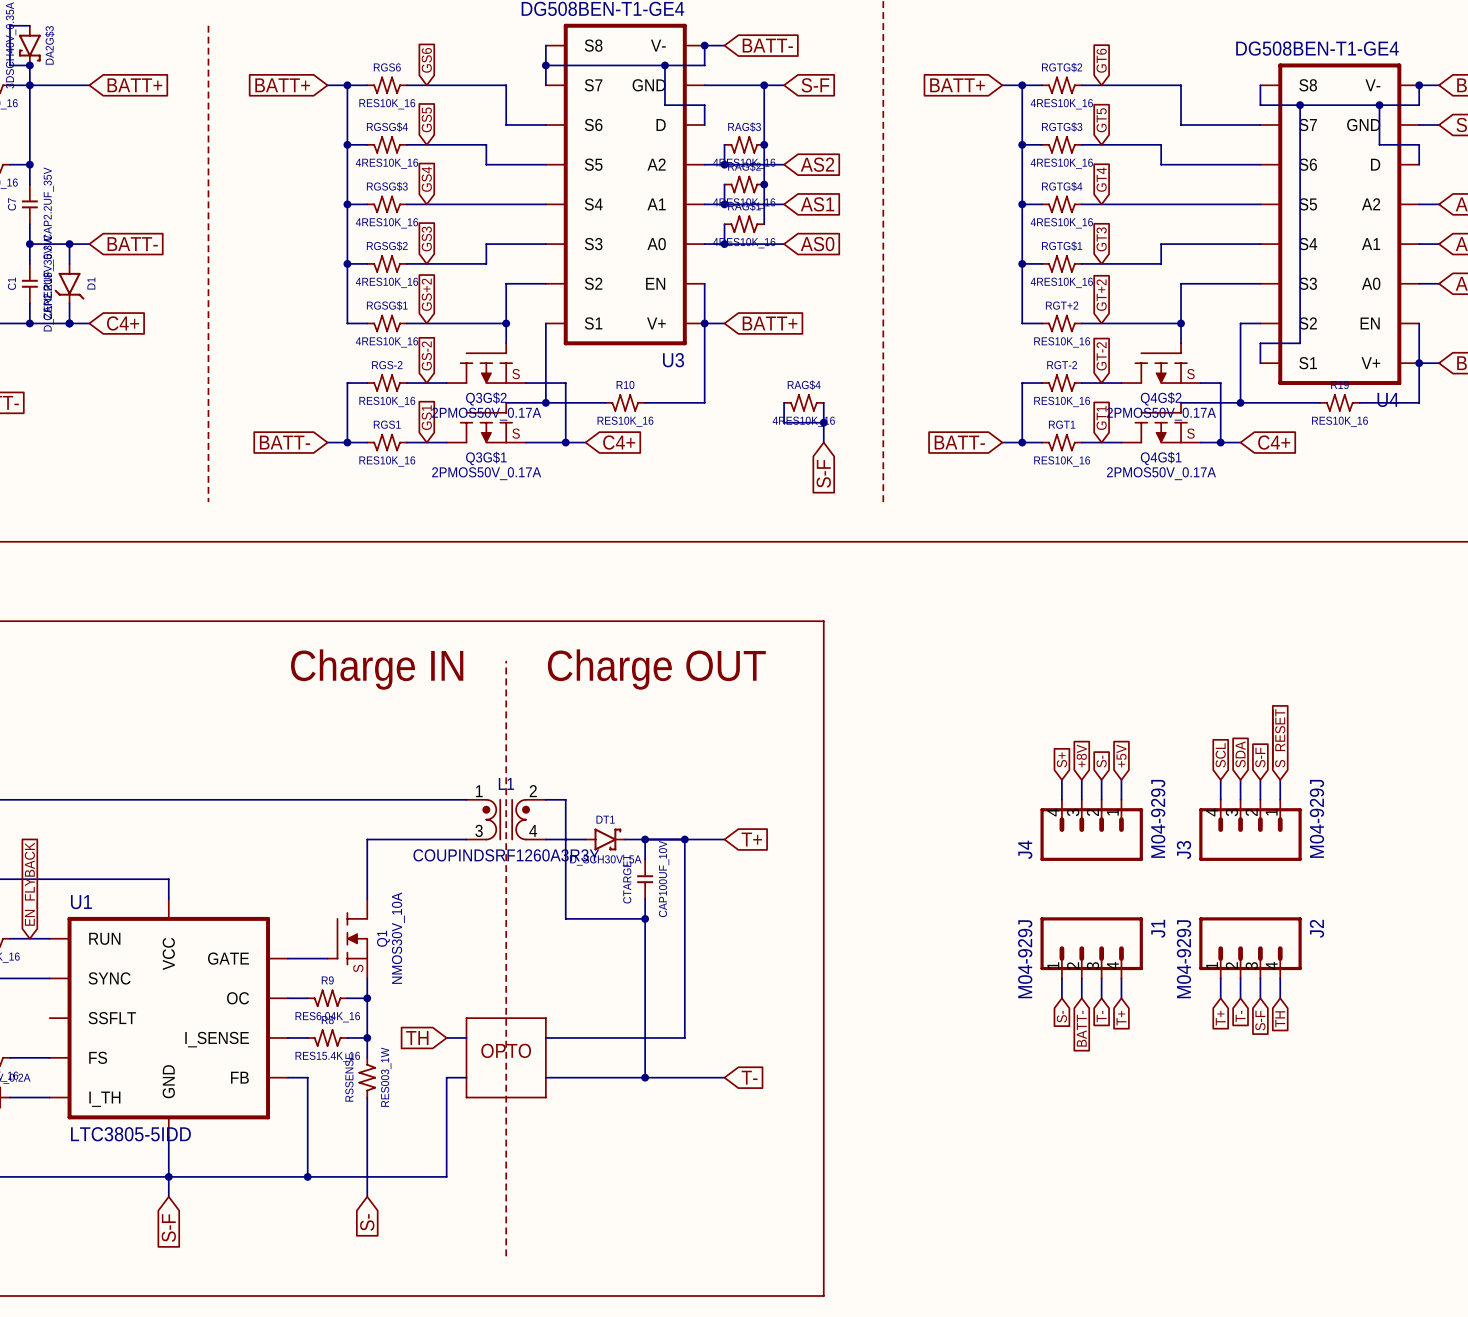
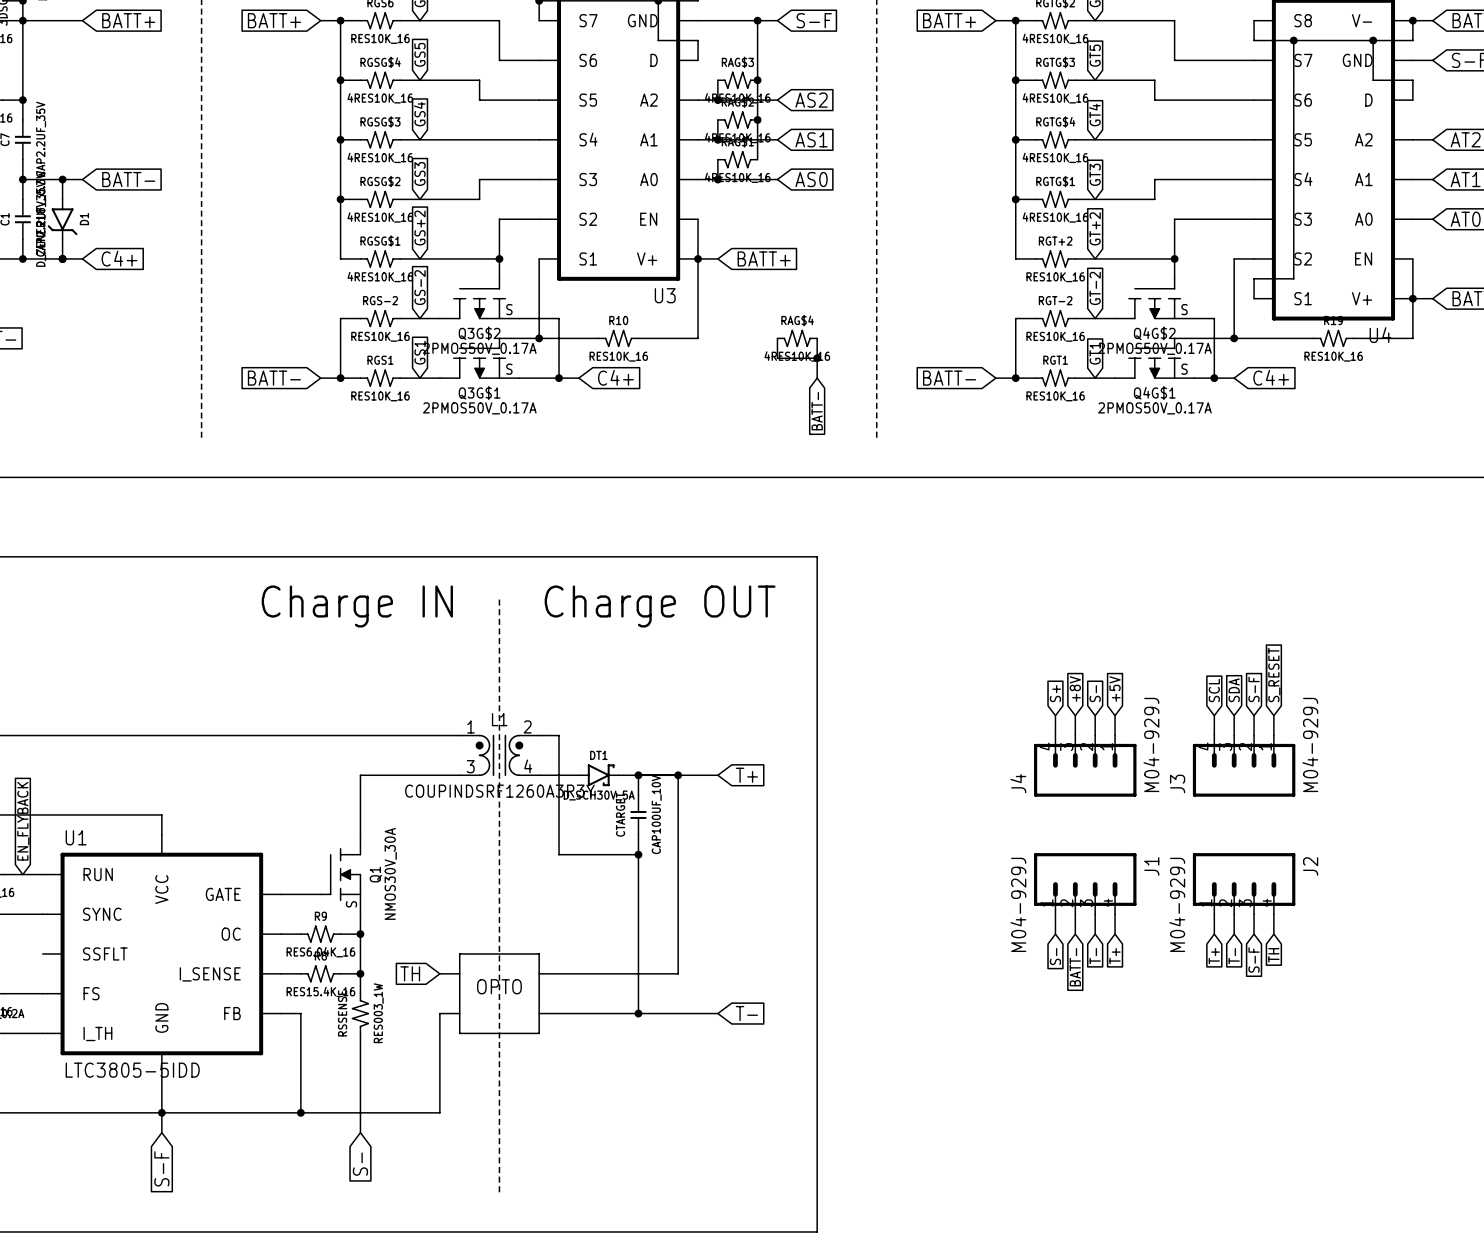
global label: S-F (823, 473) -> BATT- (817, 411)
Q1 value: NMOS30V_10A (398, 938) -> NMOS30V_30A (390, 873)

